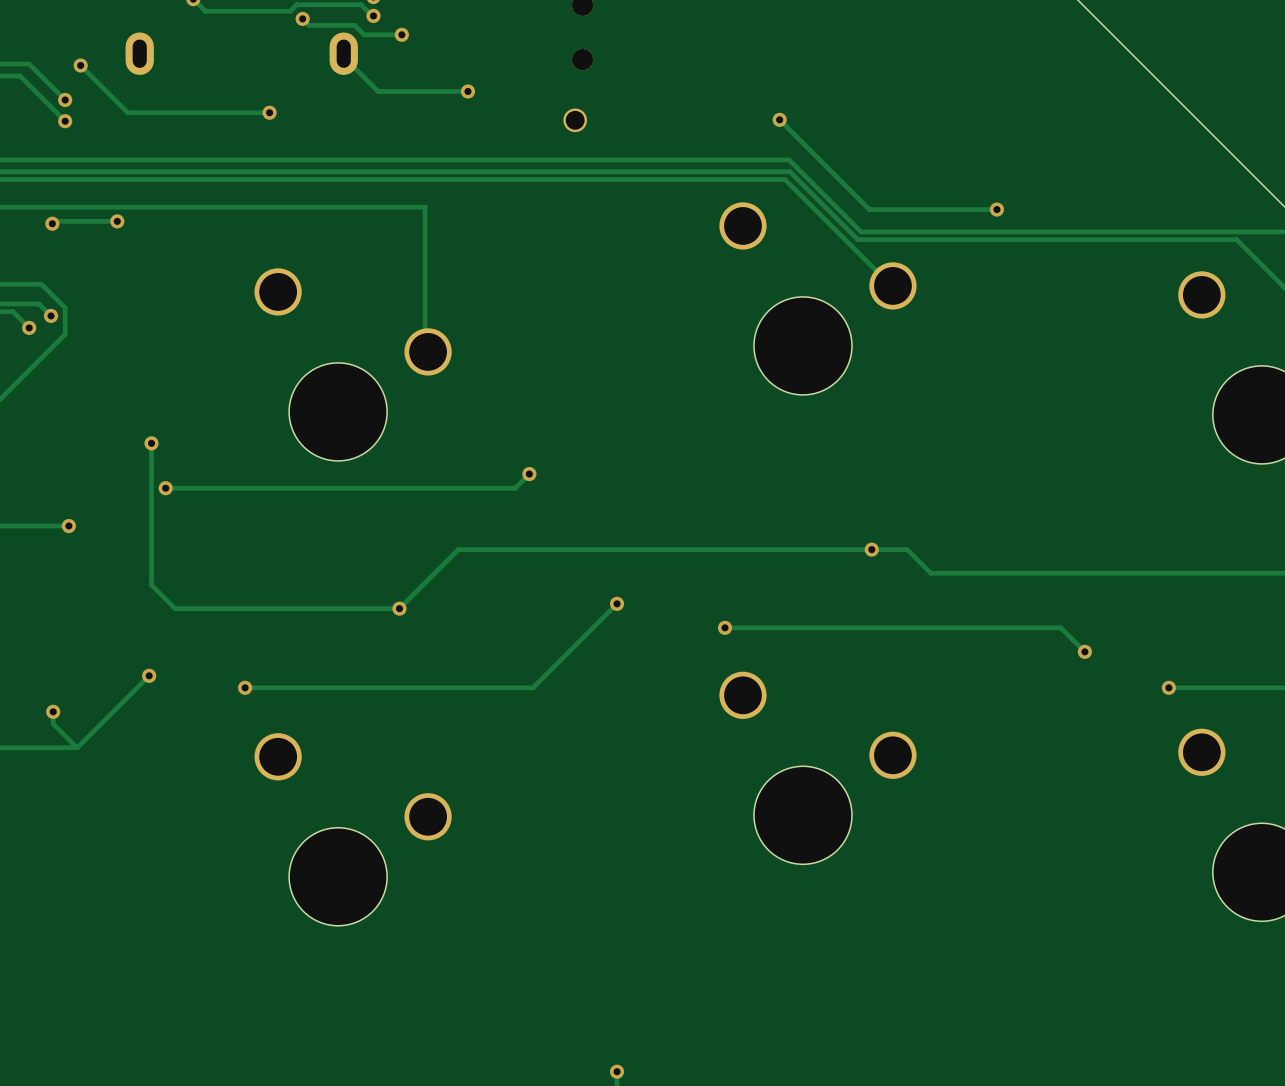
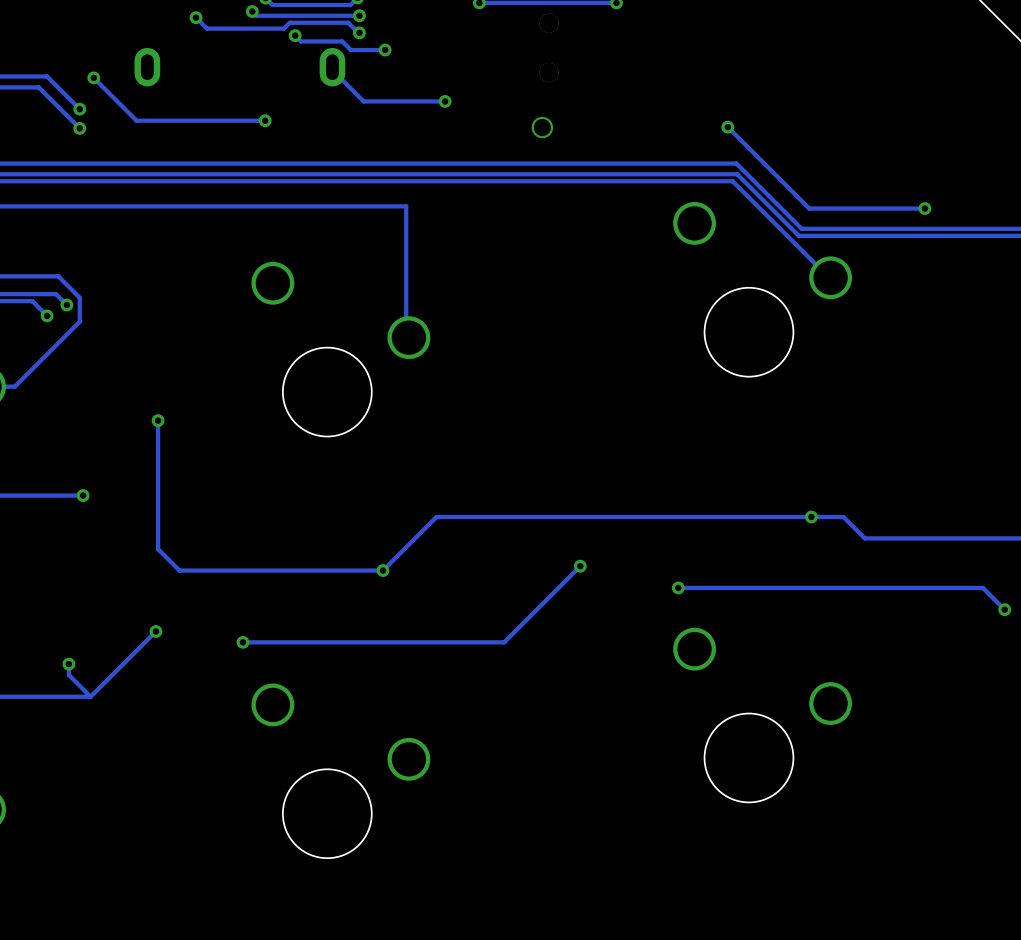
track: (117, 221) (54, 221) (52, 223) -> none
via: (117, 221) -> none
via: (52, 223) -> none
track: (529, 474) (515, 488) (165, 488) -> none
via: (529, 474) -> none
via: (165, 488) -> none

